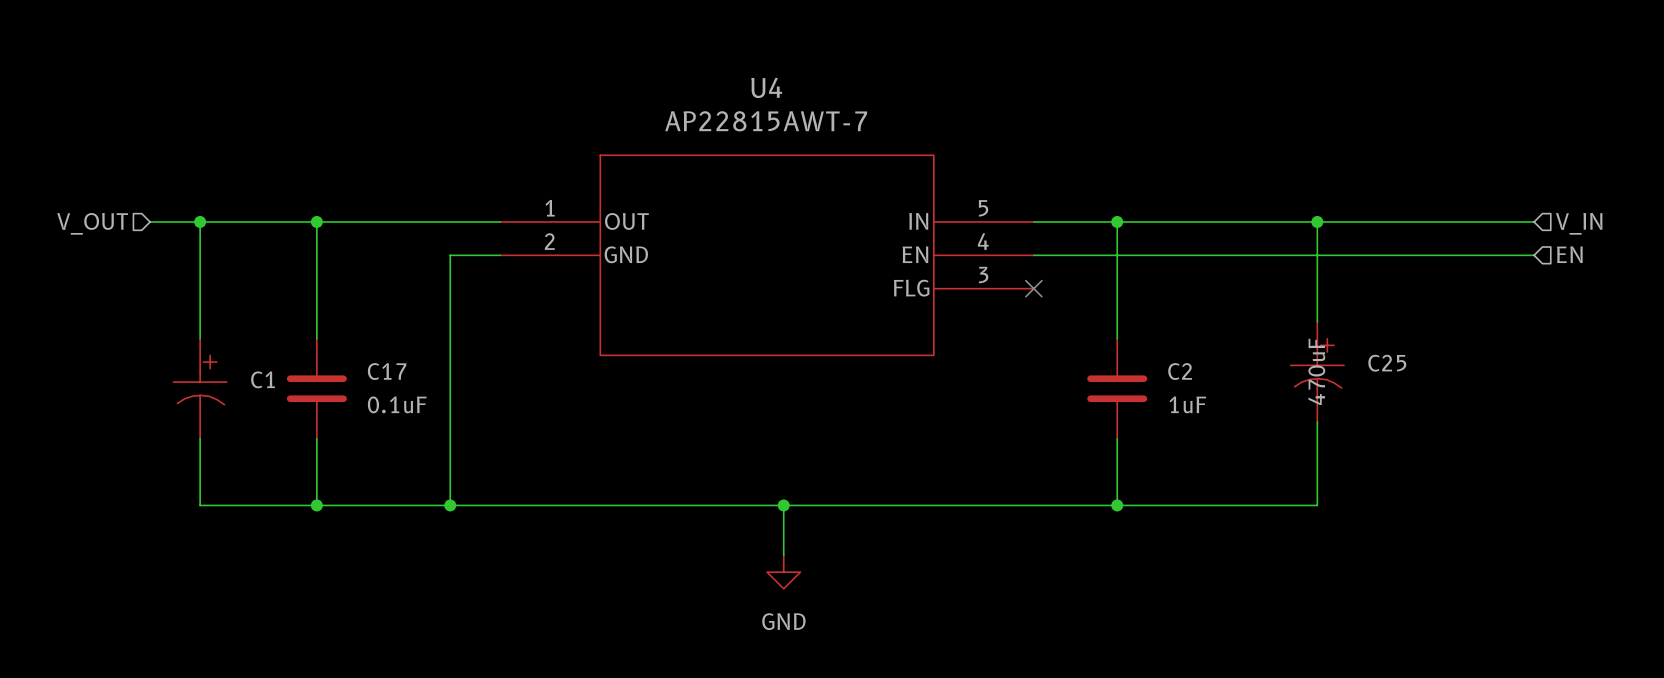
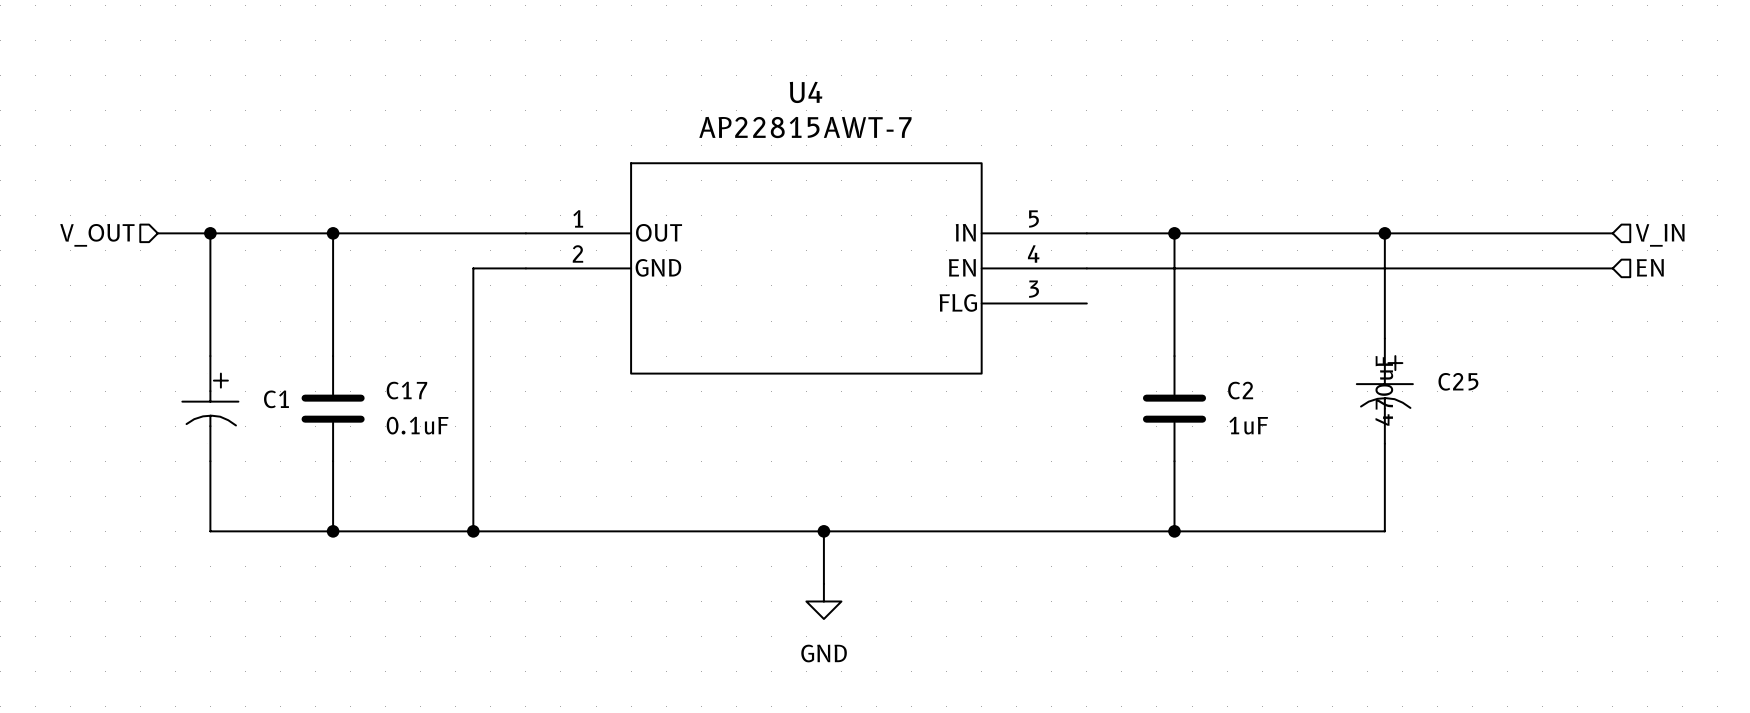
no-connect mark: (1033, 288) -> none

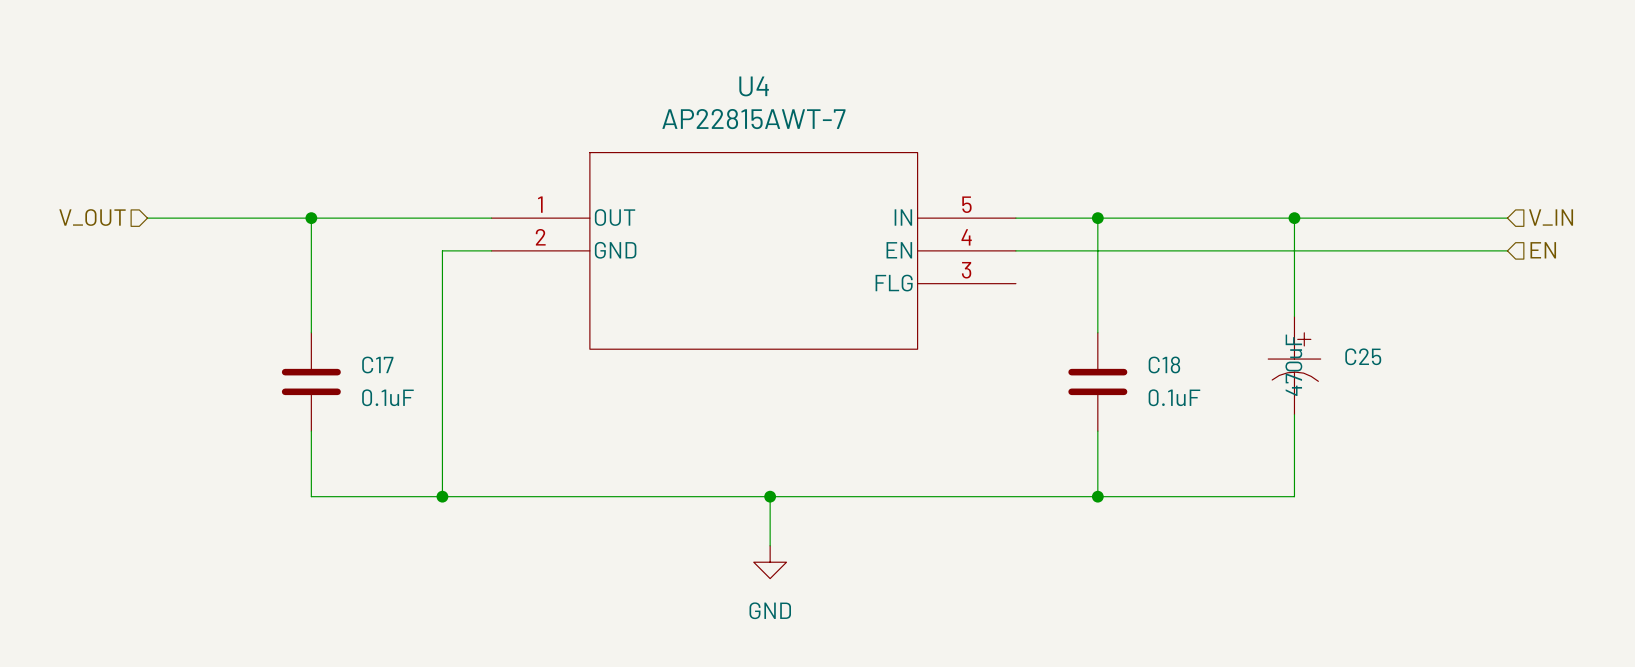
wire: (210, 233) (210, 356) -> none
junction: (210, 233) -> none
C2 name: C2 (1240, 390) -> C18 (1164, 364)
C1: (210, 408) -> none
C2 value: 1uF (1248, 425) -> 0.1uF (1174, 397)
wire: (210, 461) (210, 531) (333, 531) -> none
junction: (333, 531) -> none

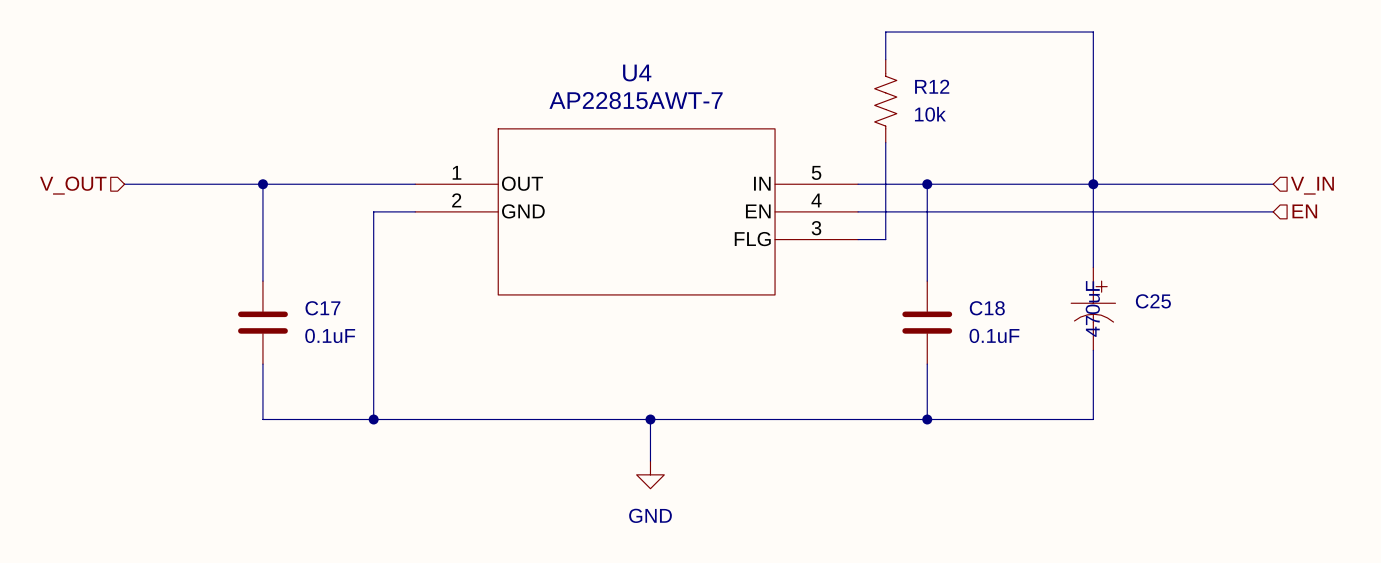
wire: none -> (885, 59) (885, 32) (1093, 32) (1093, 184)
R12: none -> 10k (885, 101)
wire: none -> (885, 142) (885, 239) (858, 239)

